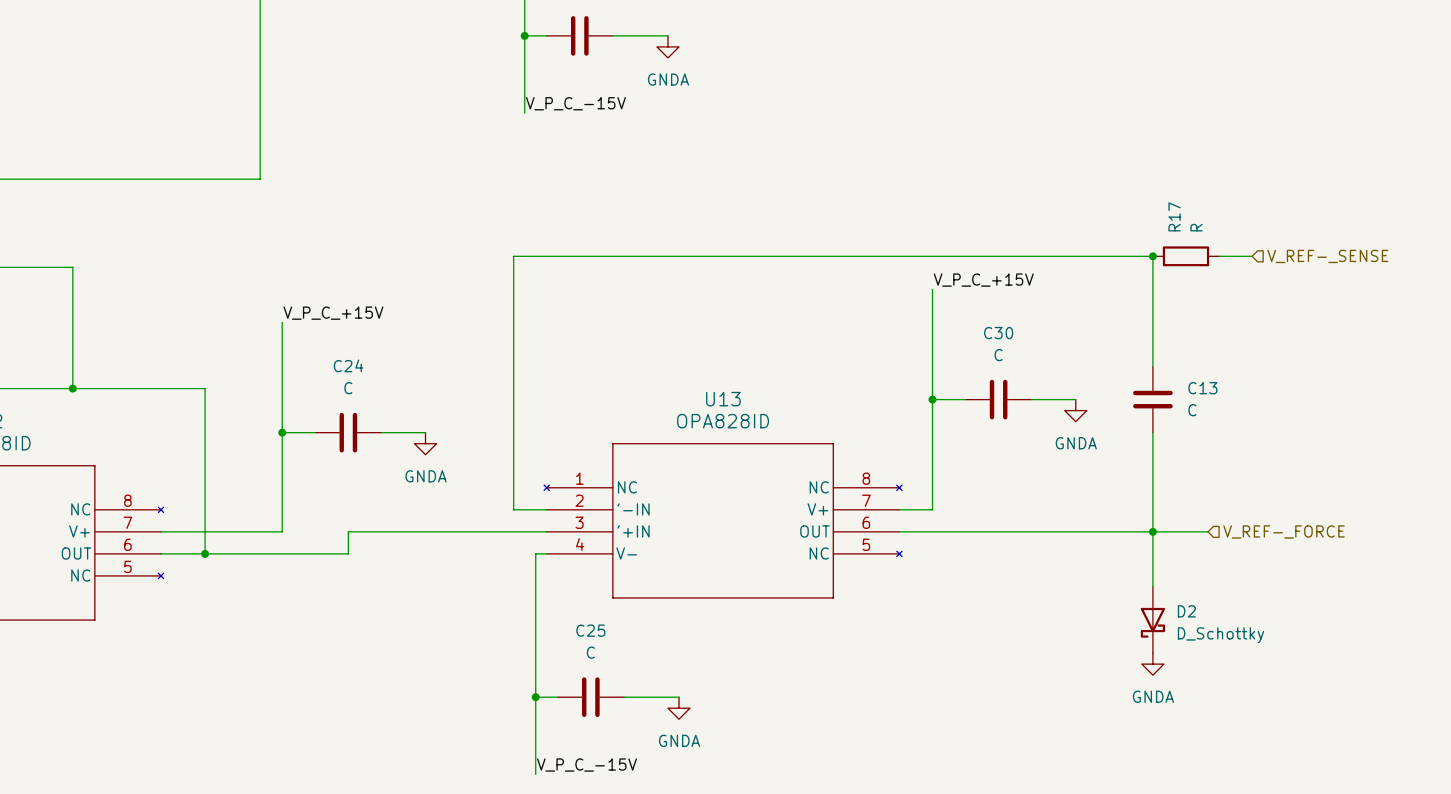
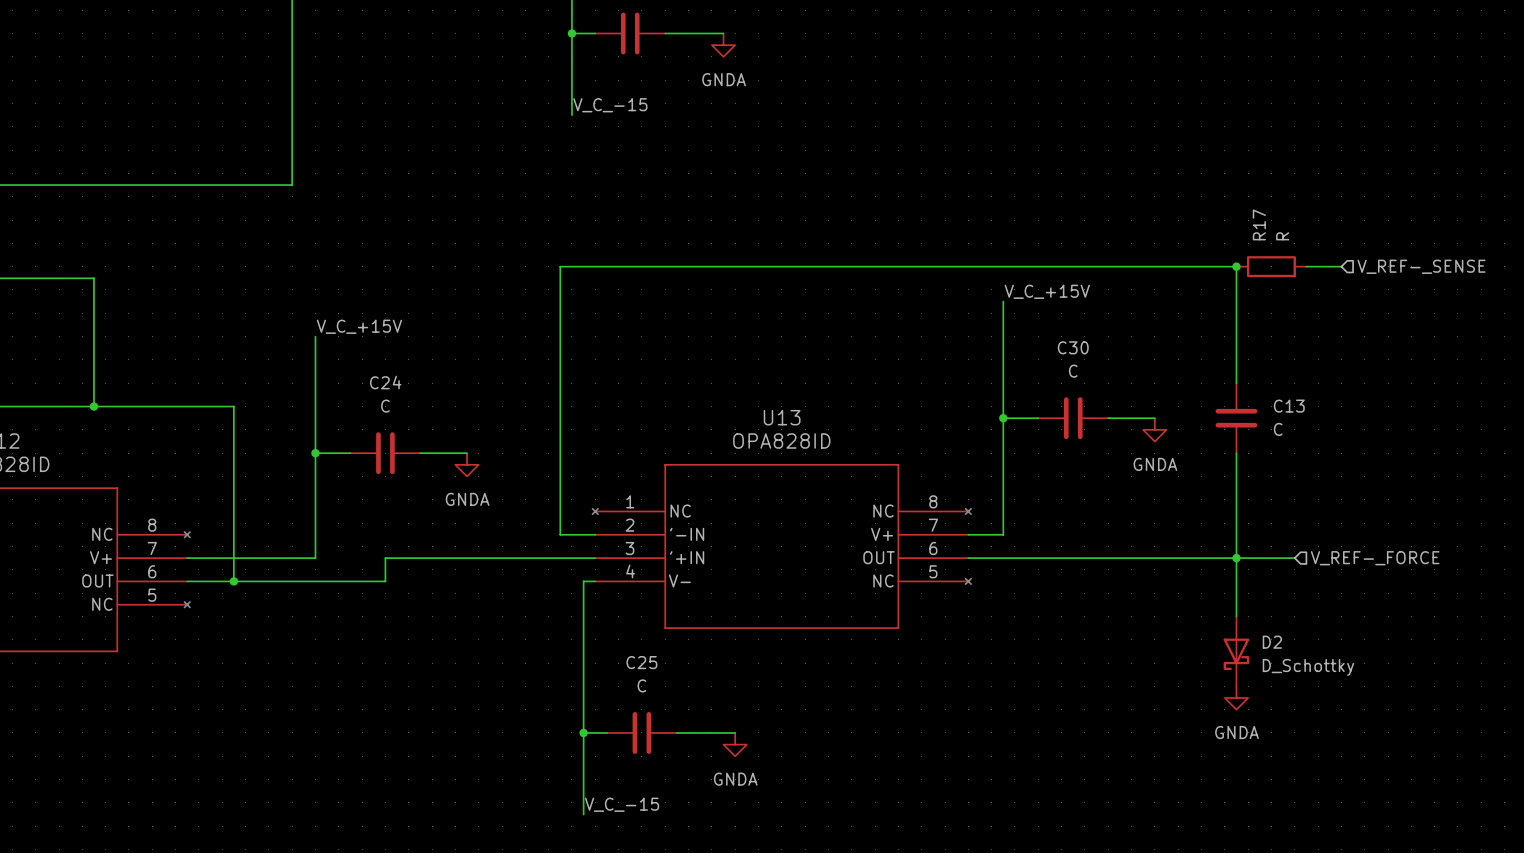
label: V_P_C_-15V (575, 103) -> V_C_-15 (610, 105)
label: V_P_C_+15V (983, 280) -> V_C_+15V (1047, 291)
label: V_P_C_+15V (333, 313) -> V_C_+15V (359, 326)
label: V_P_C_-15V (586, 765) -> V_C_-15 (622, 804)

